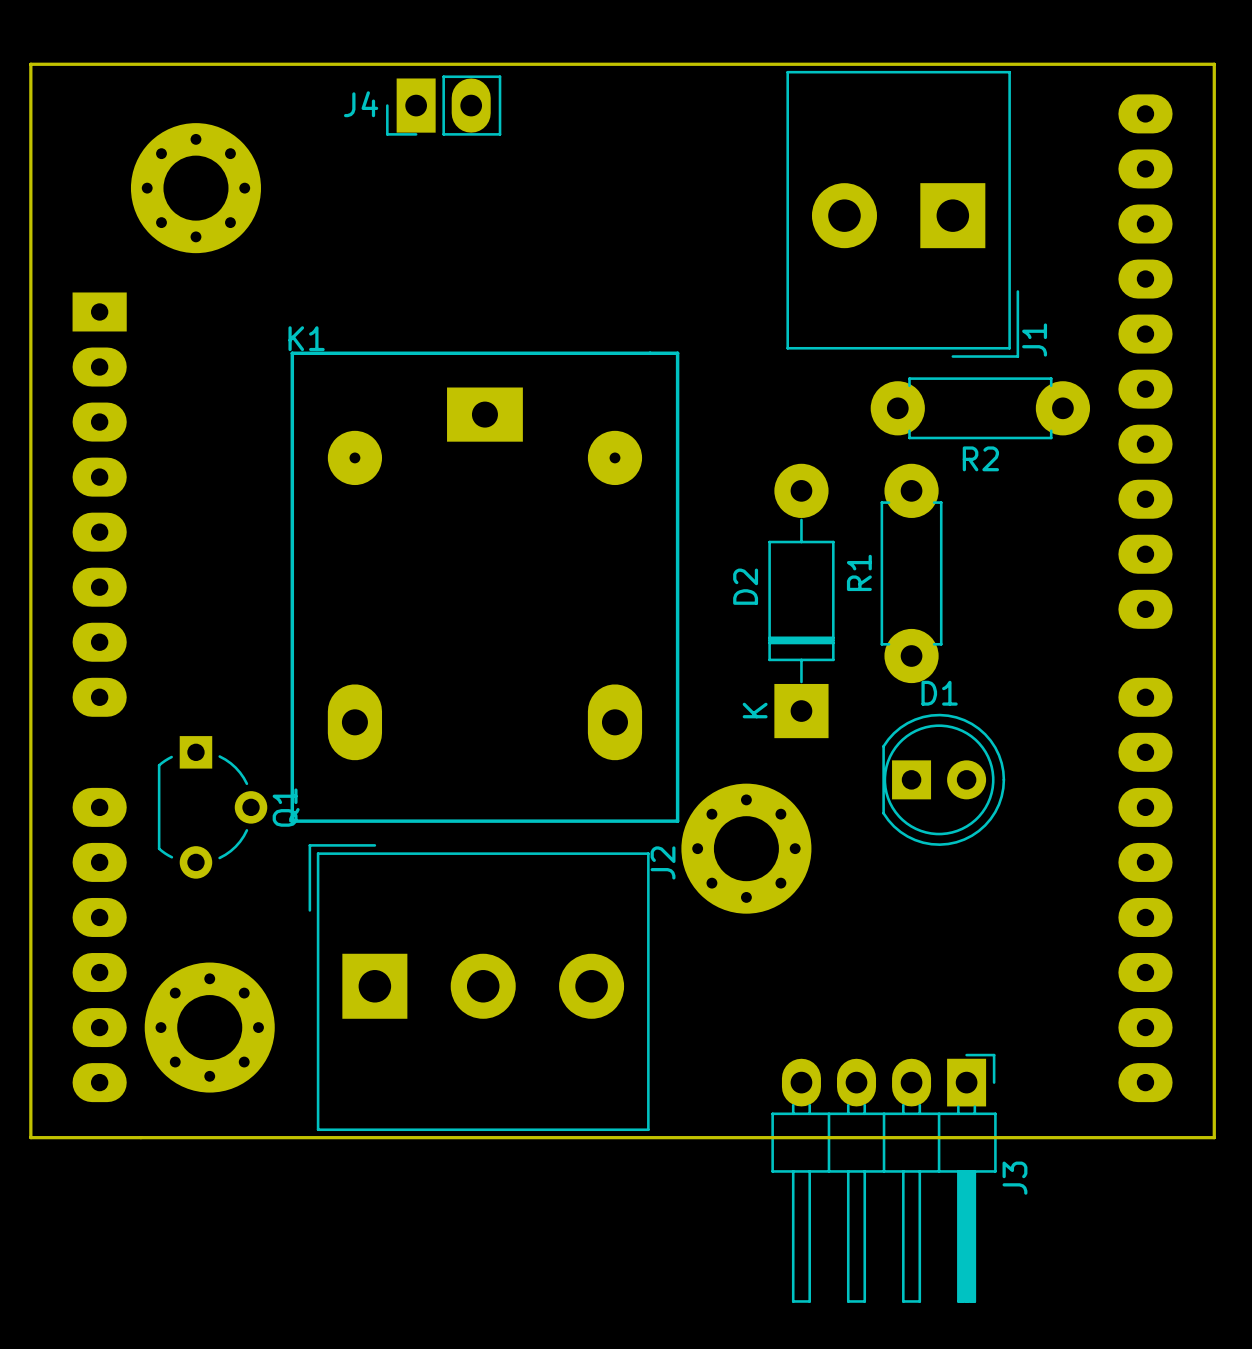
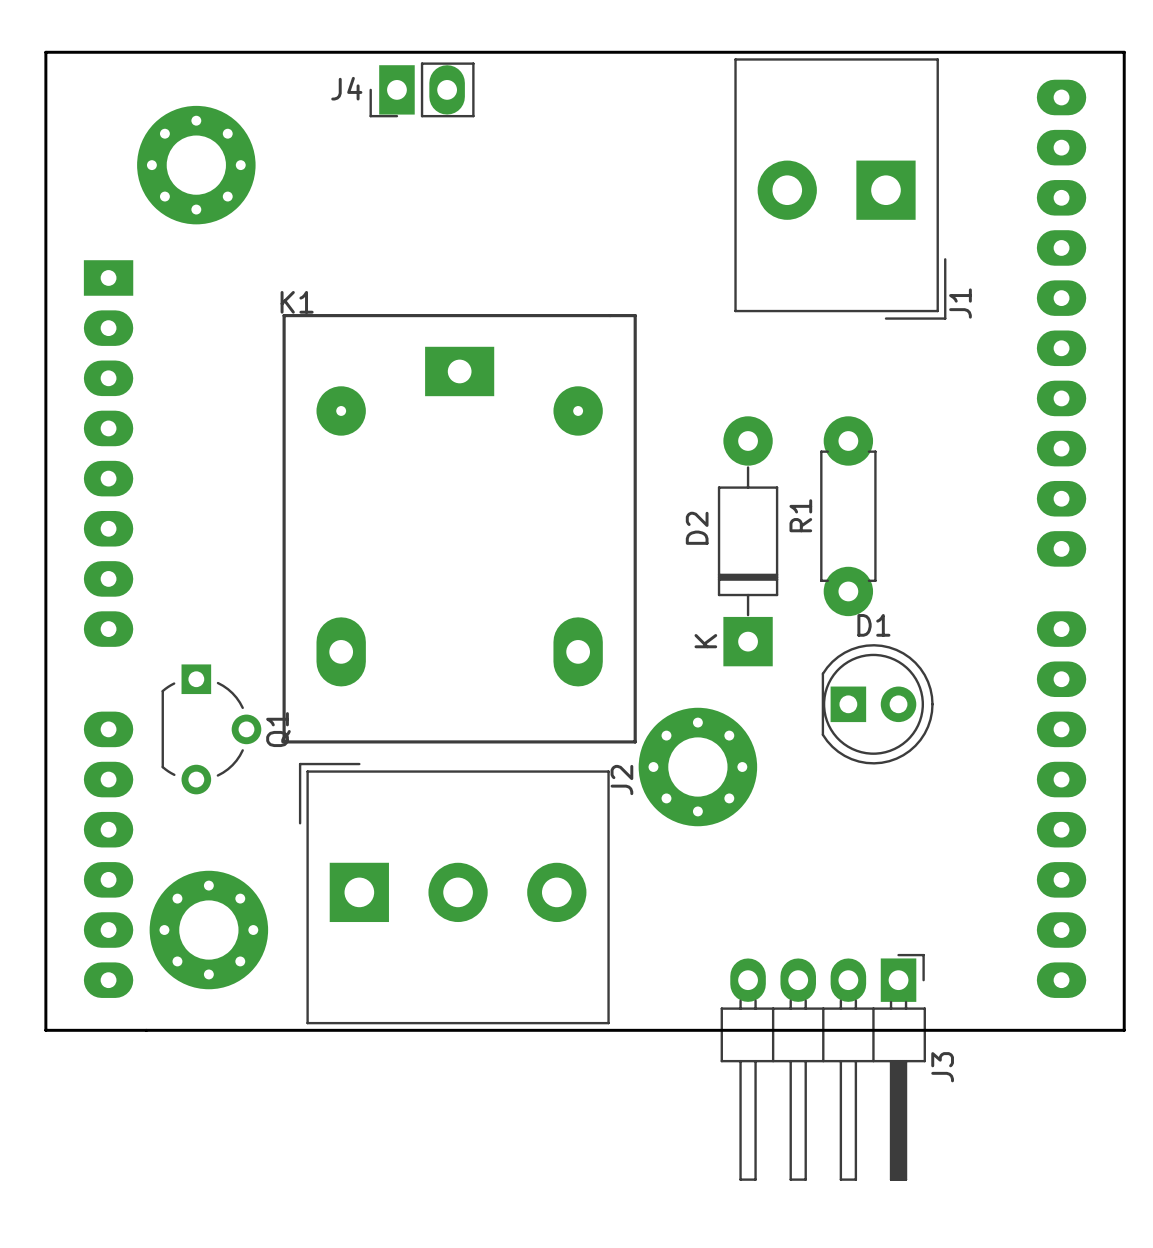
R2: (980, 408) -> none

